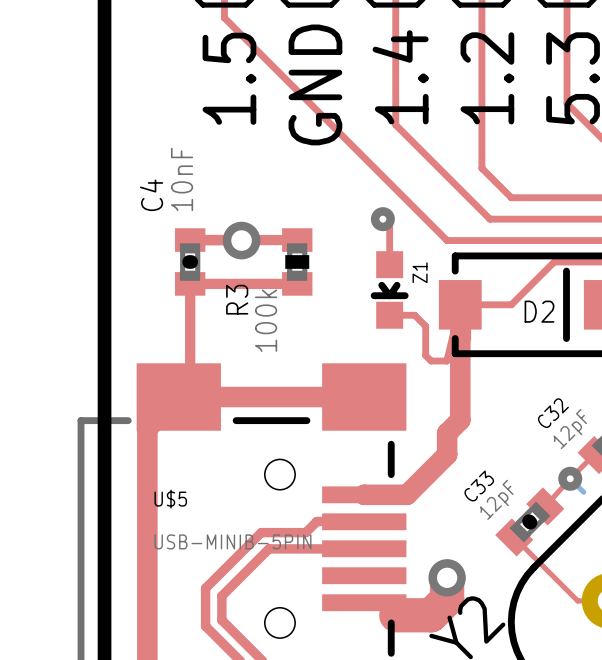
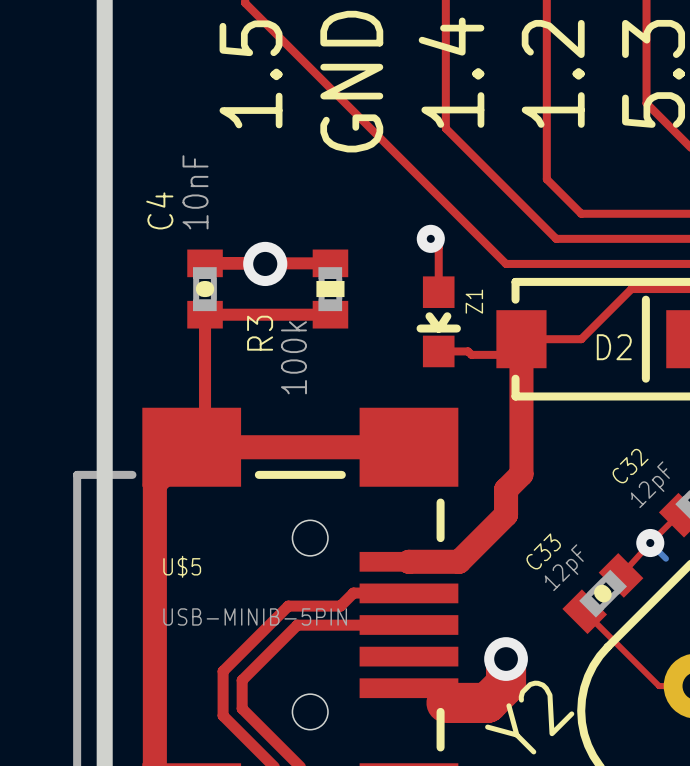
top track: (468, 283) (468, 339) (460, 304) (446, 361) (431, 361) (425, 355) (425, 326) (417, 318) -> (521, 354) (471, 354)

